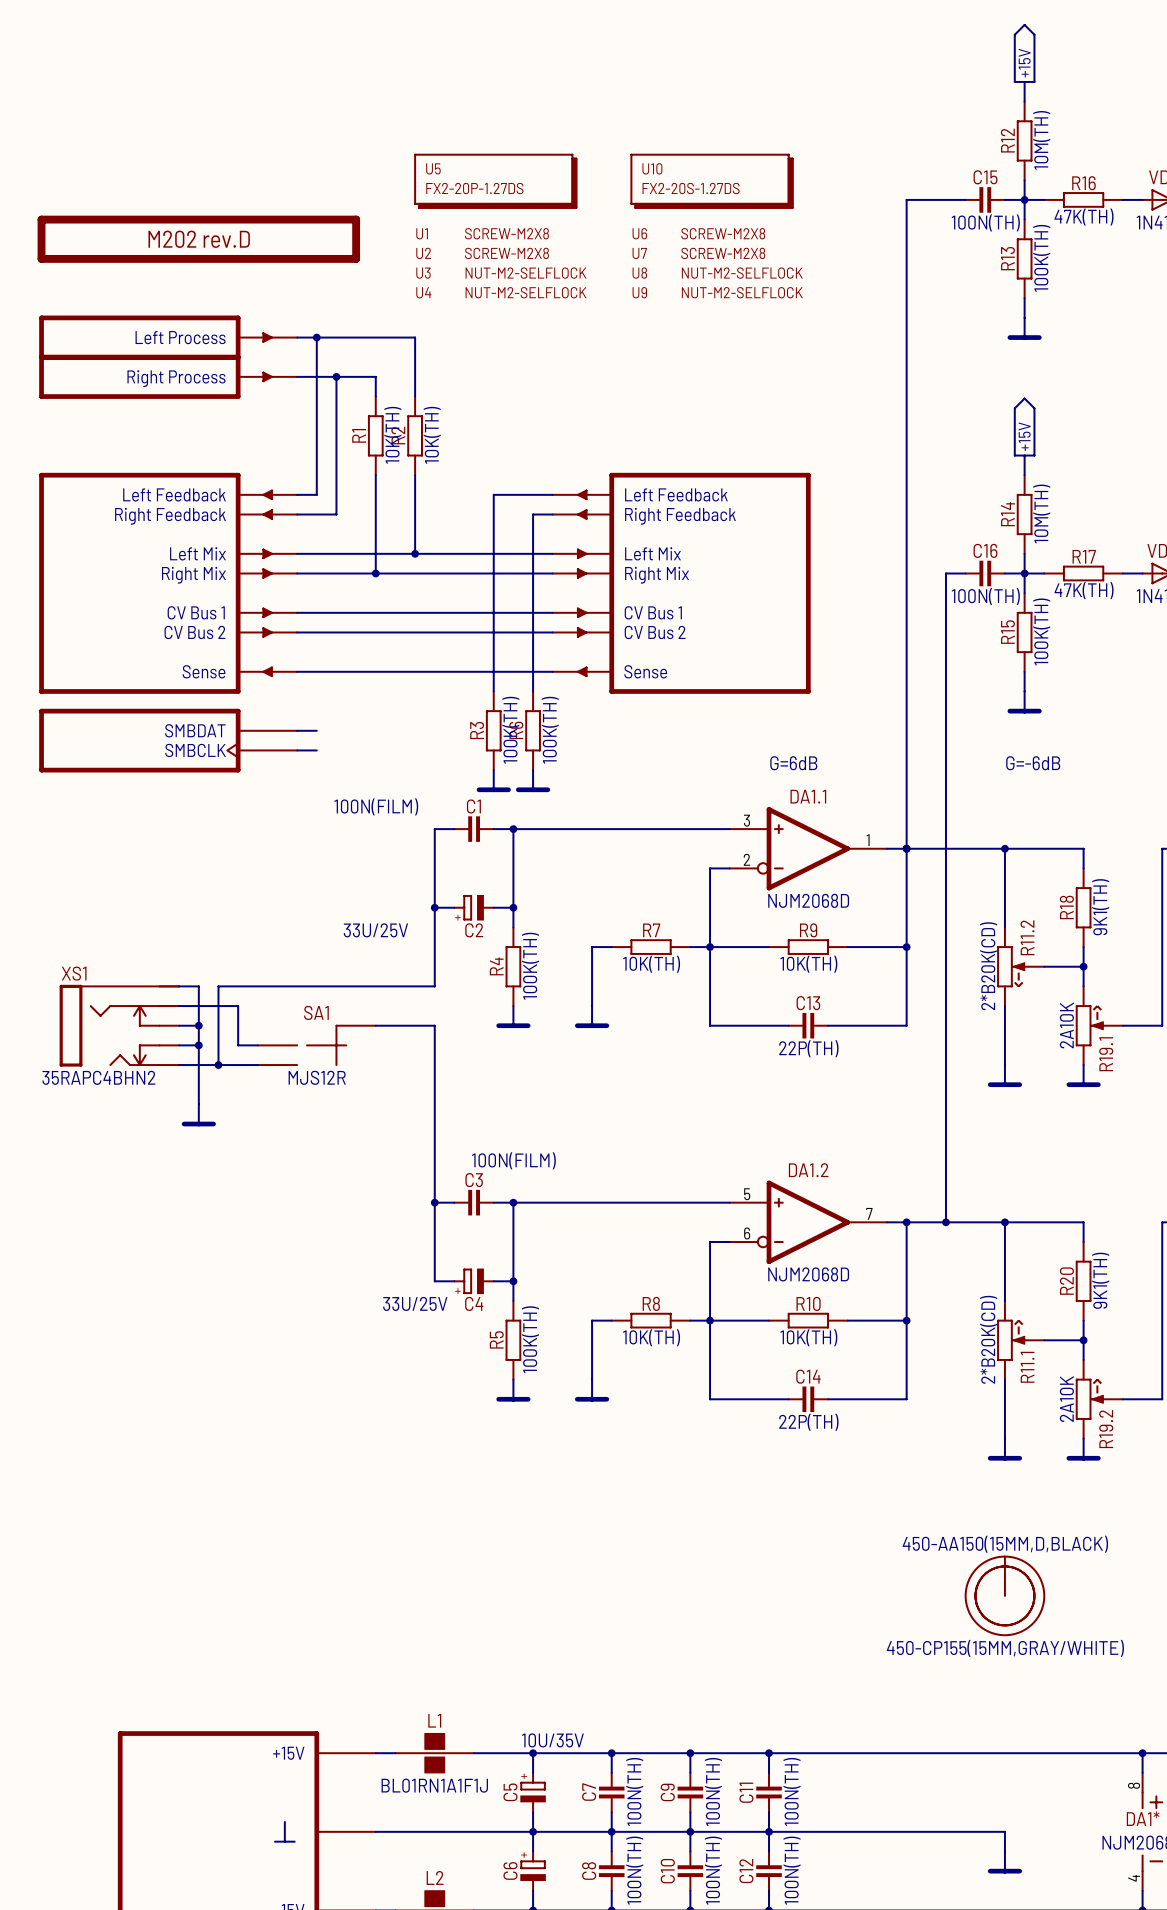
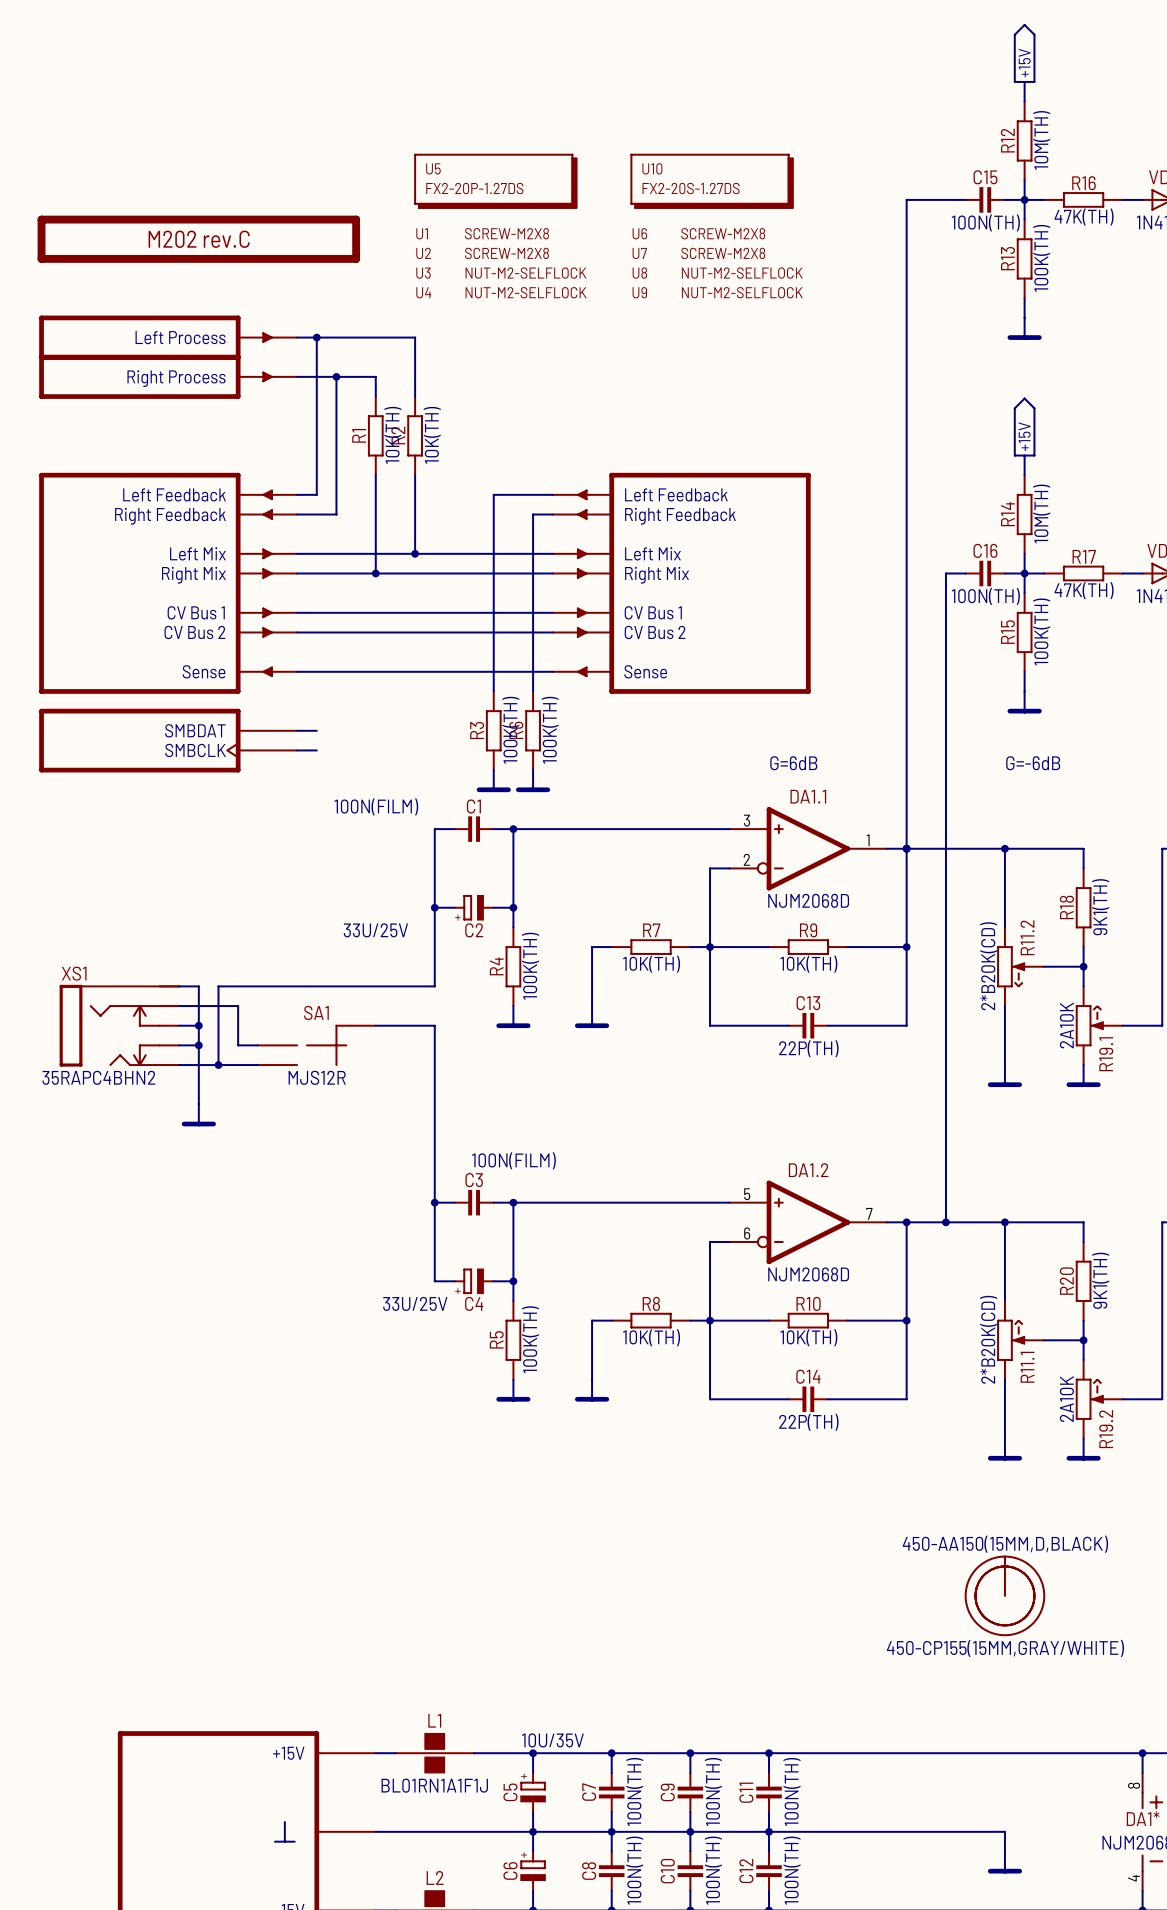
part value: M202 rev.D (199, 239) -> M202 rev.C (199, 239)

